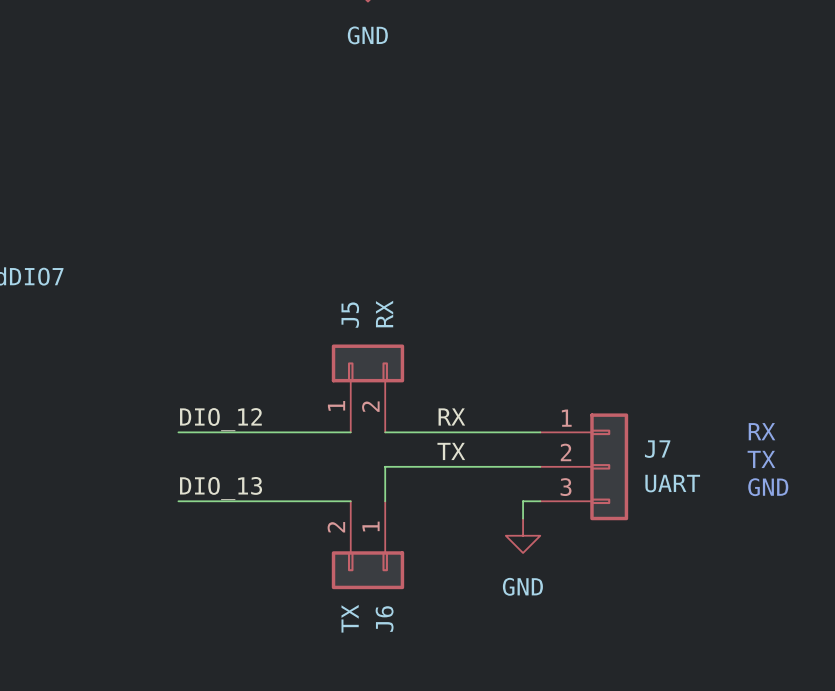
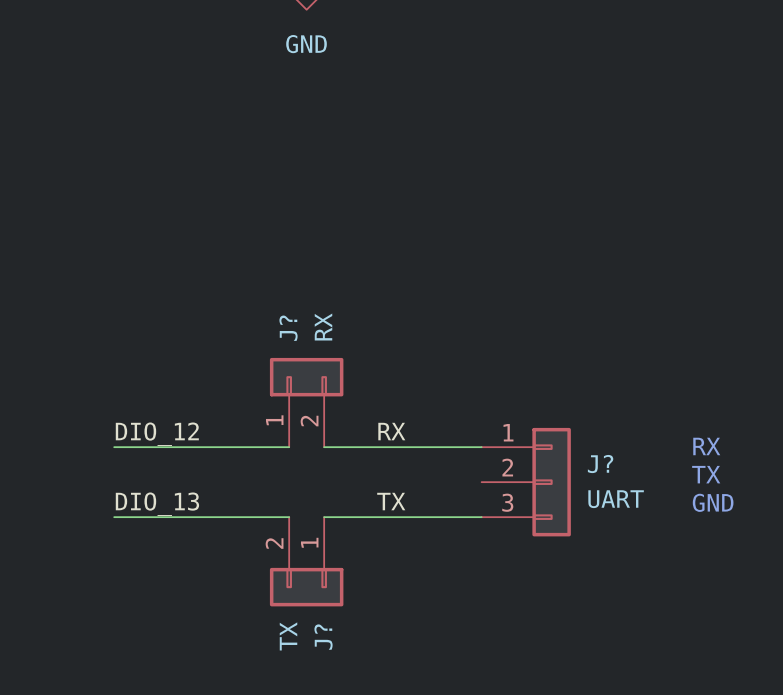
J5 name: J5 (350, 315) -> J? (288, 328)
J7 name: J7 (657, 449) -> J? (600, 464)
label position: TX (451, 451) -> TX (391, 501)
wire: (540, 466) (385, 466) (385, 501) -> (464, 517) (324, 517)
wire: (523, 501) (523, 518) -> none
power symbol: GND (523, 535) -> none
J6 name: J6 (384, 619) -> J? (323, 637)

